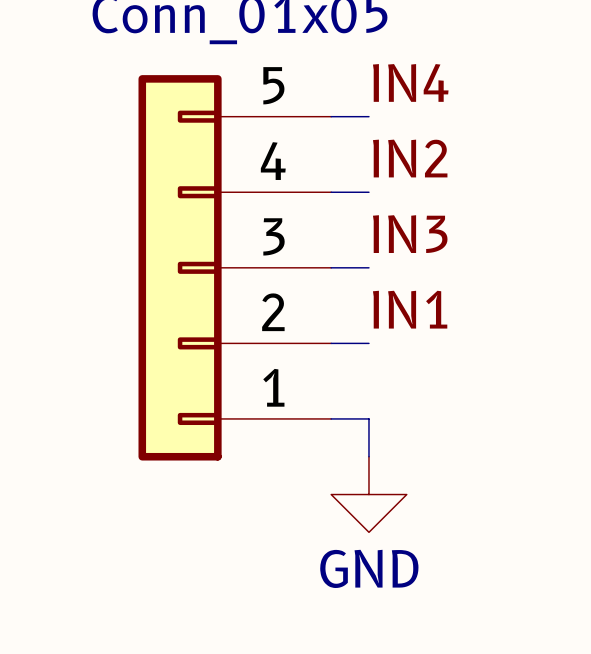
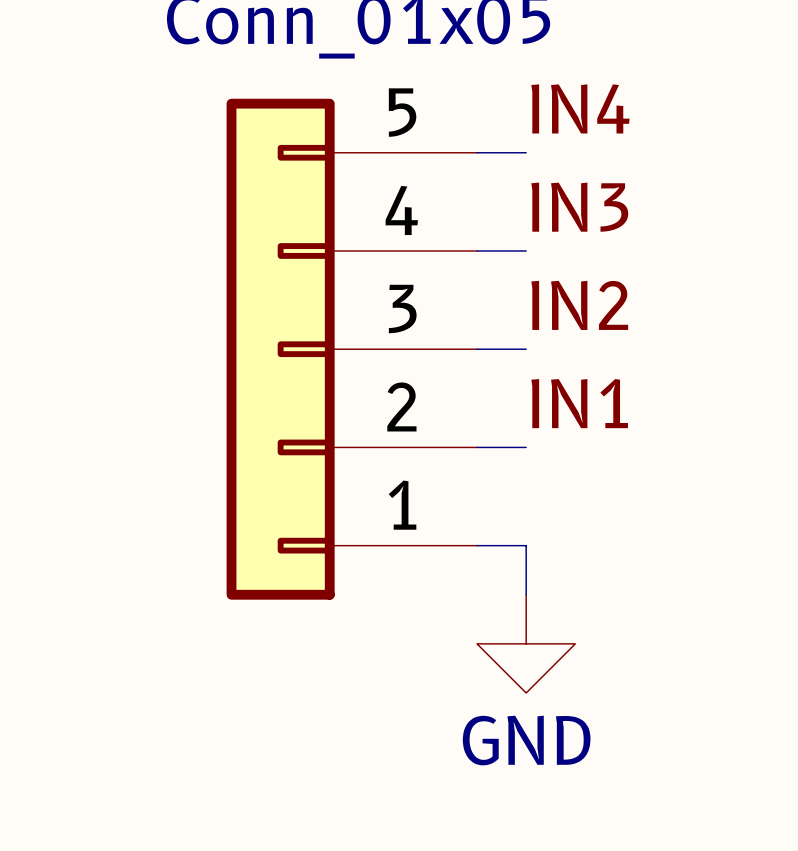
label: IN2 (410, 158) -> IN3 (579, 207)
label: IN3 (410, 234) -> IN2 (579, 305)

